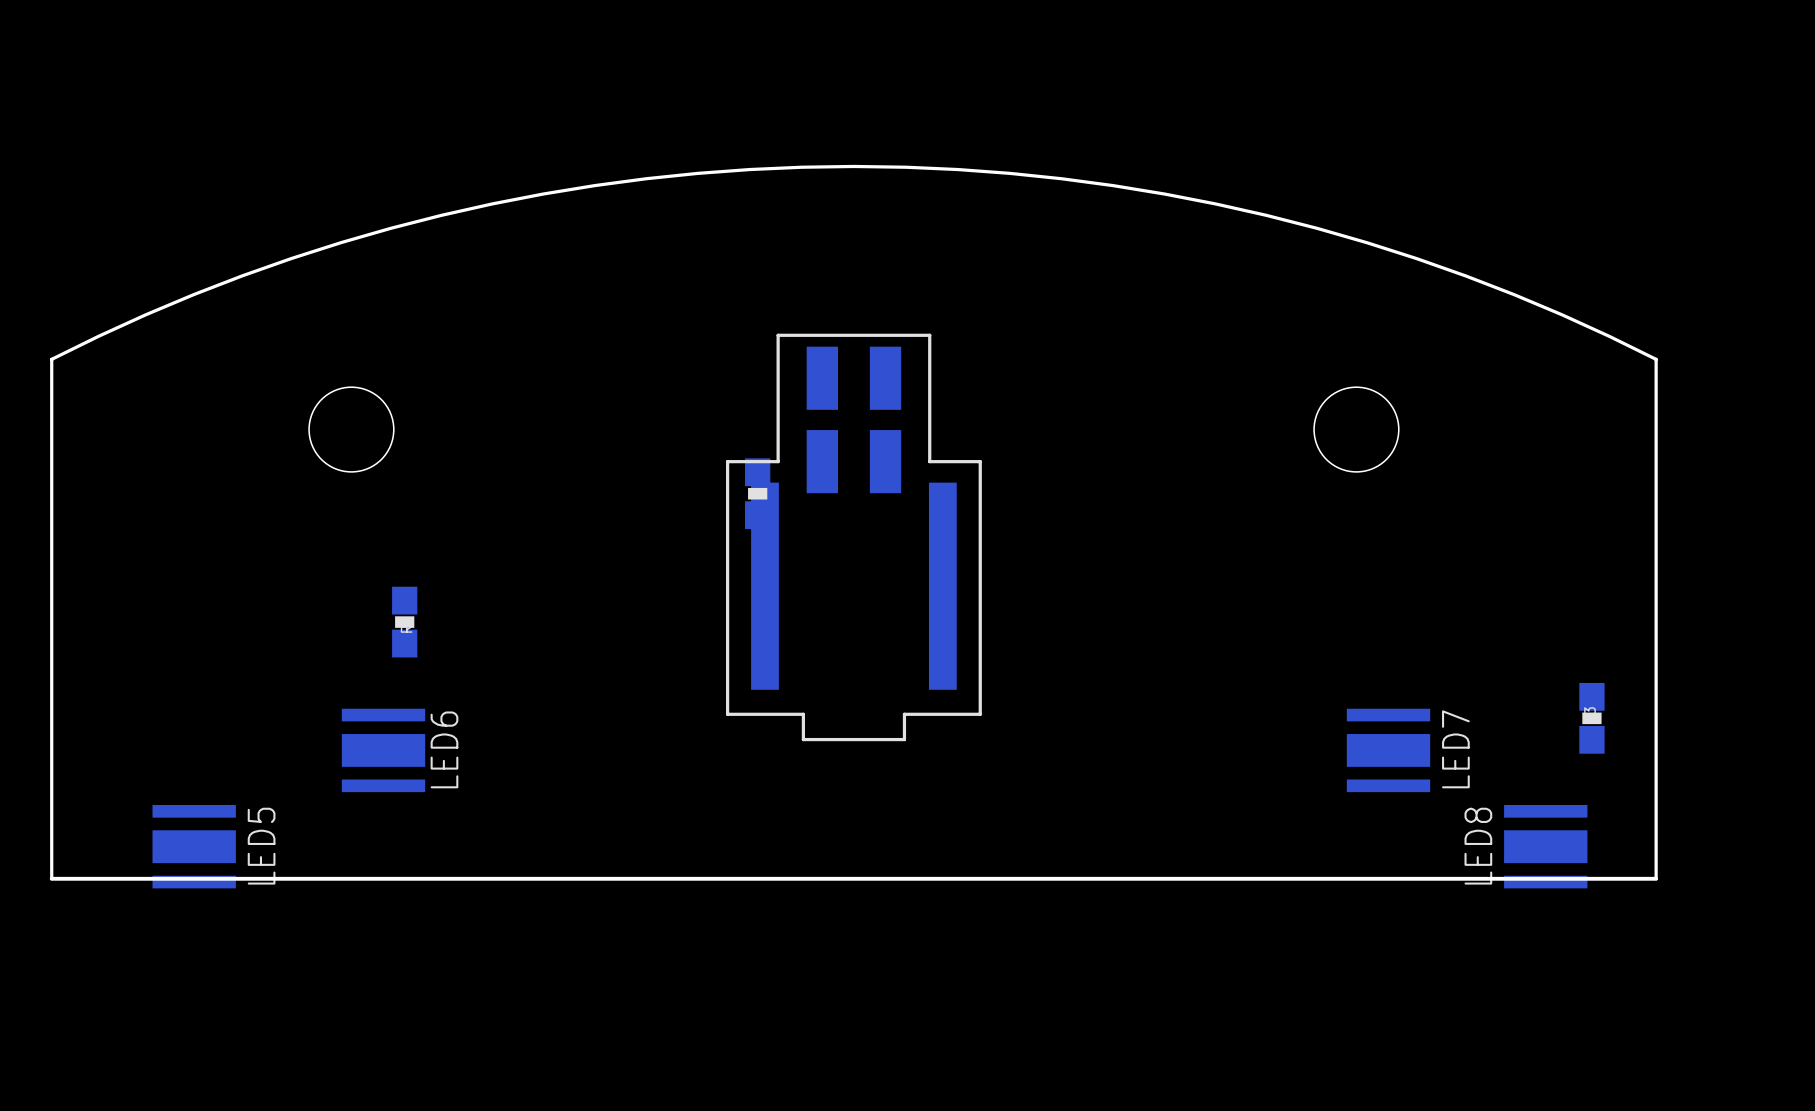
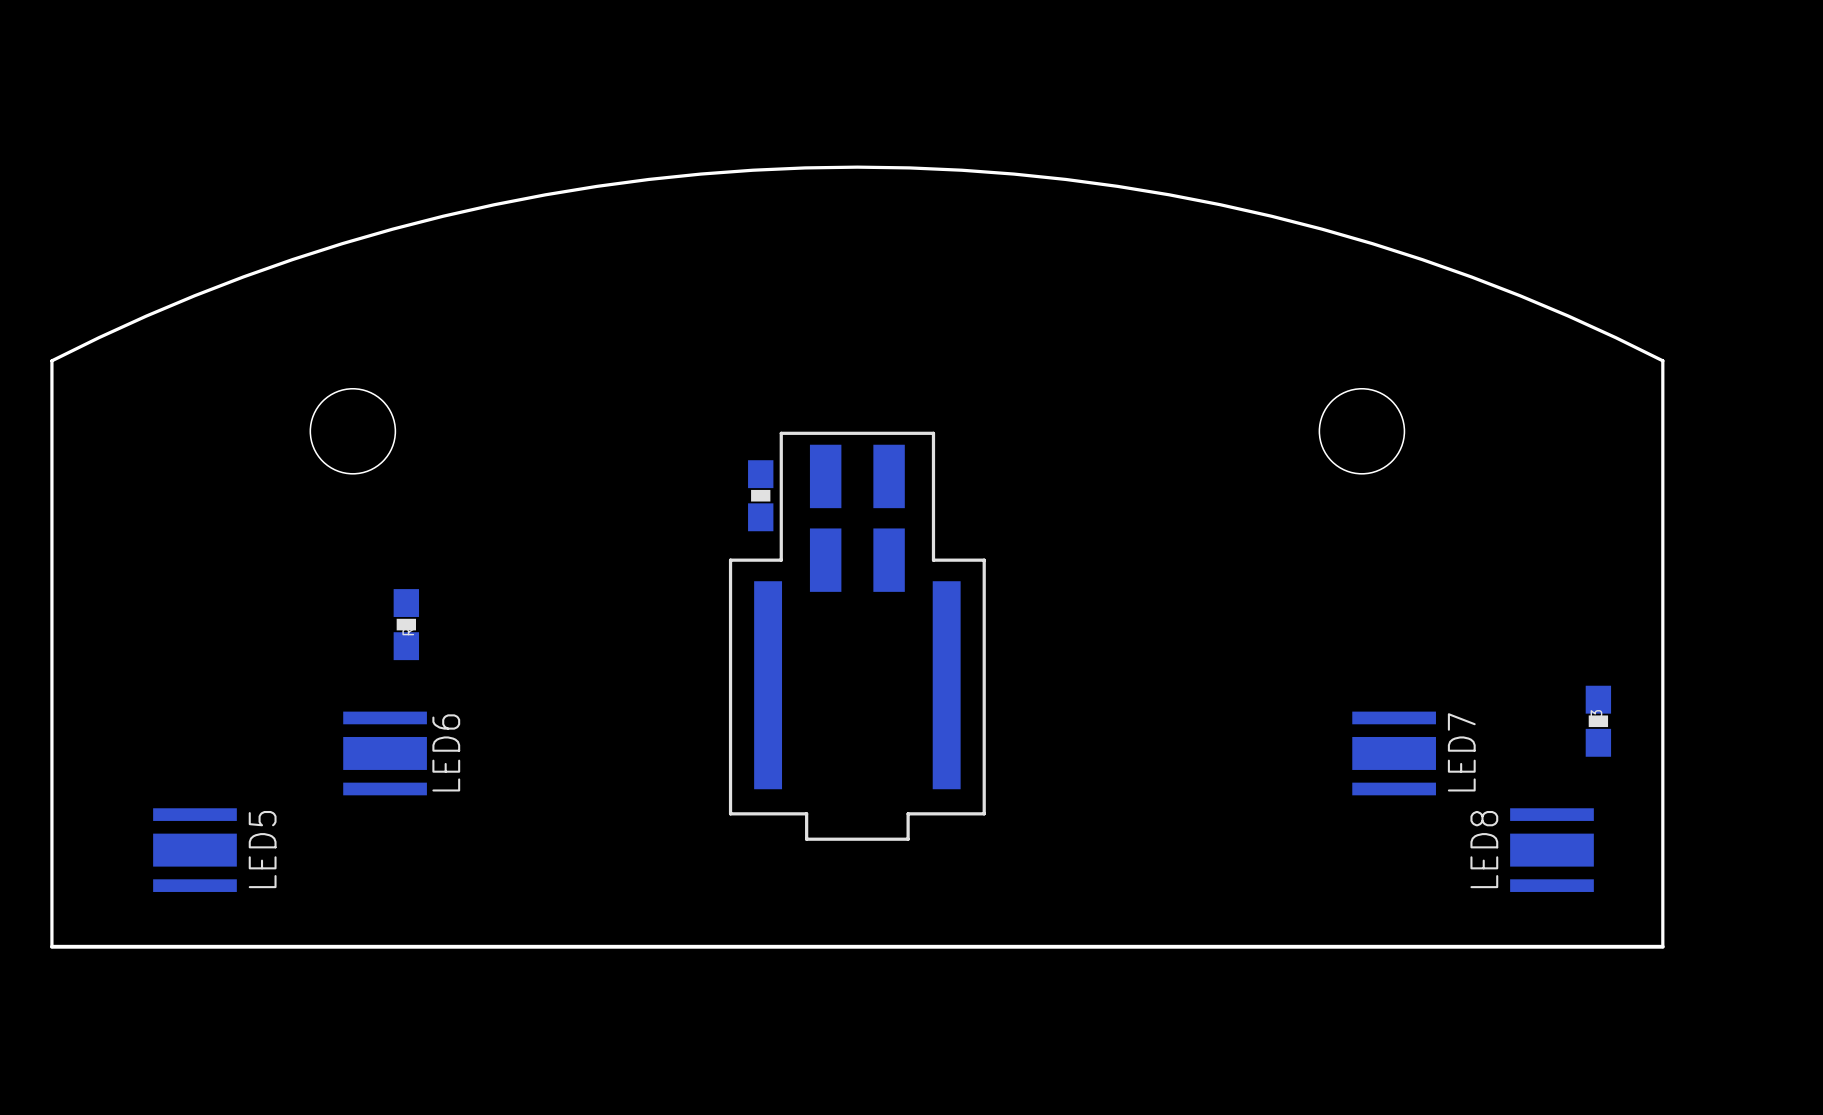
part position: (853, 537) -> (857, 636)
board edge: (1656, 878) (51, 878) -> (1662, 882) (1662, 946) (51, 946) (51, 882)

